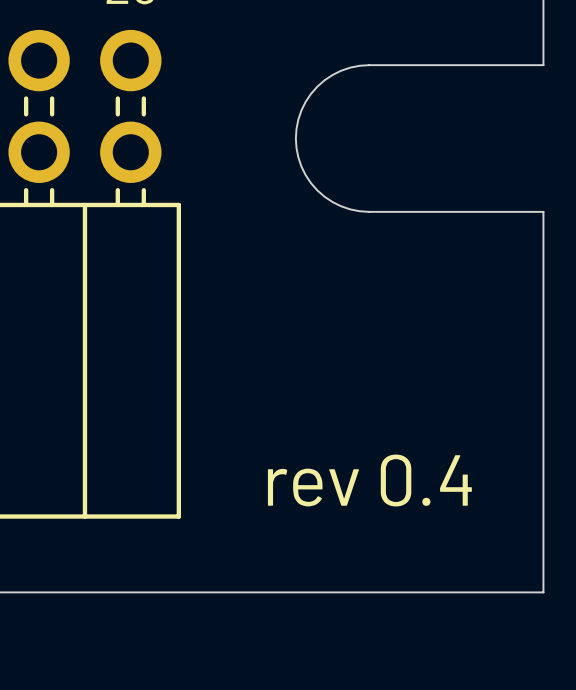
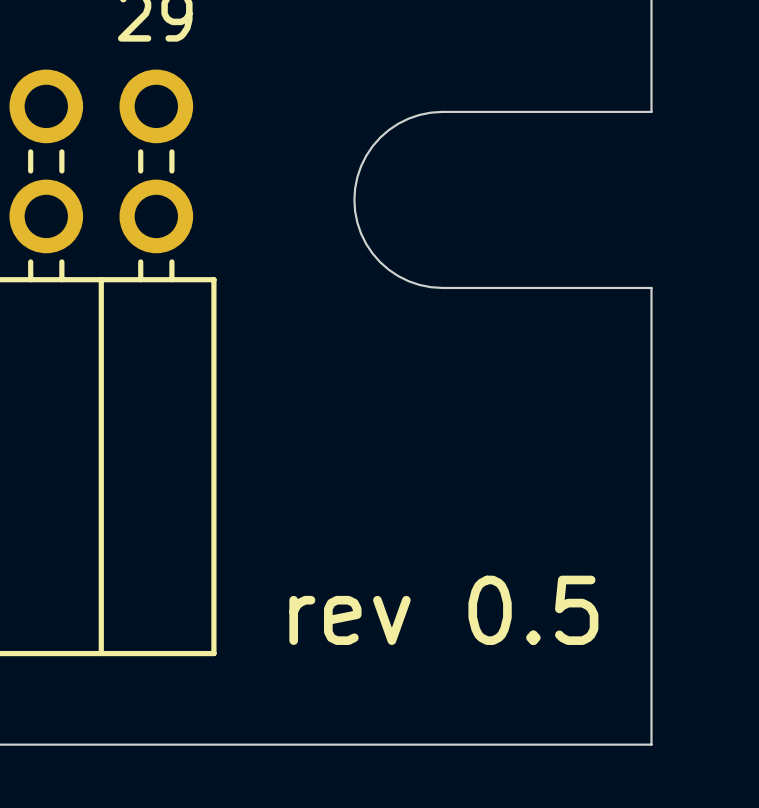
text: rev 0.4 (369, 480) -> rev 0.5 (443, 610)

